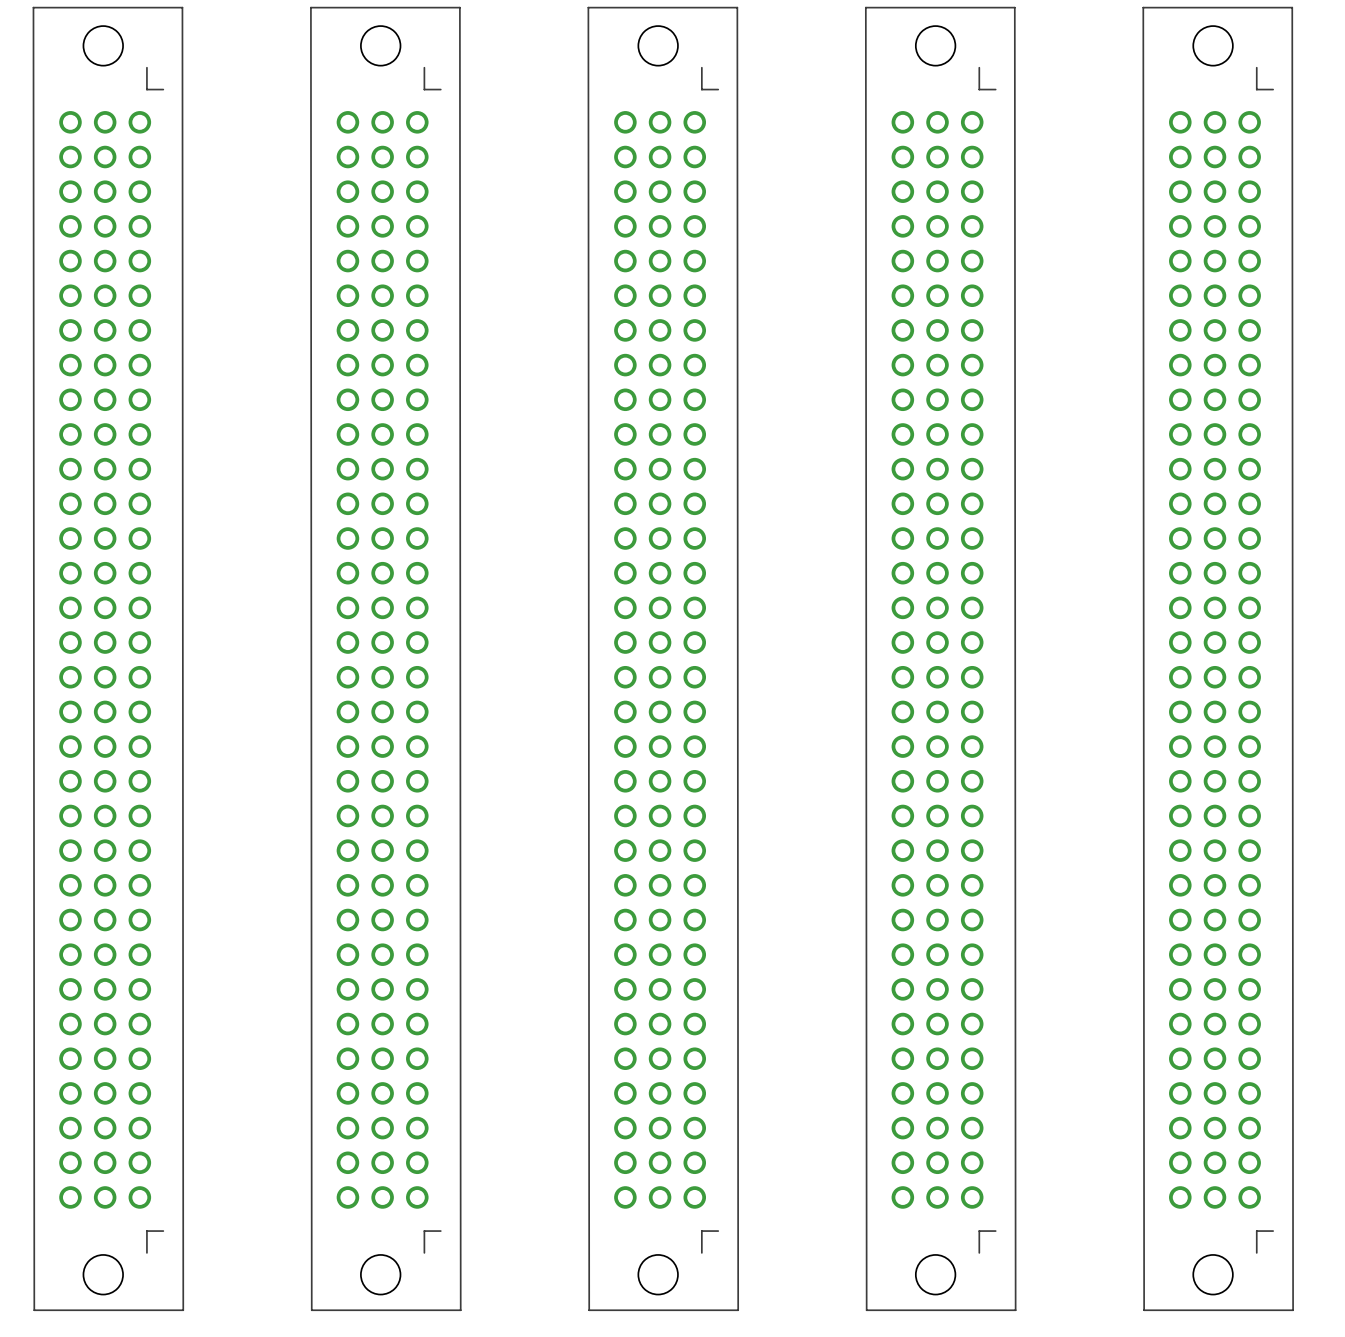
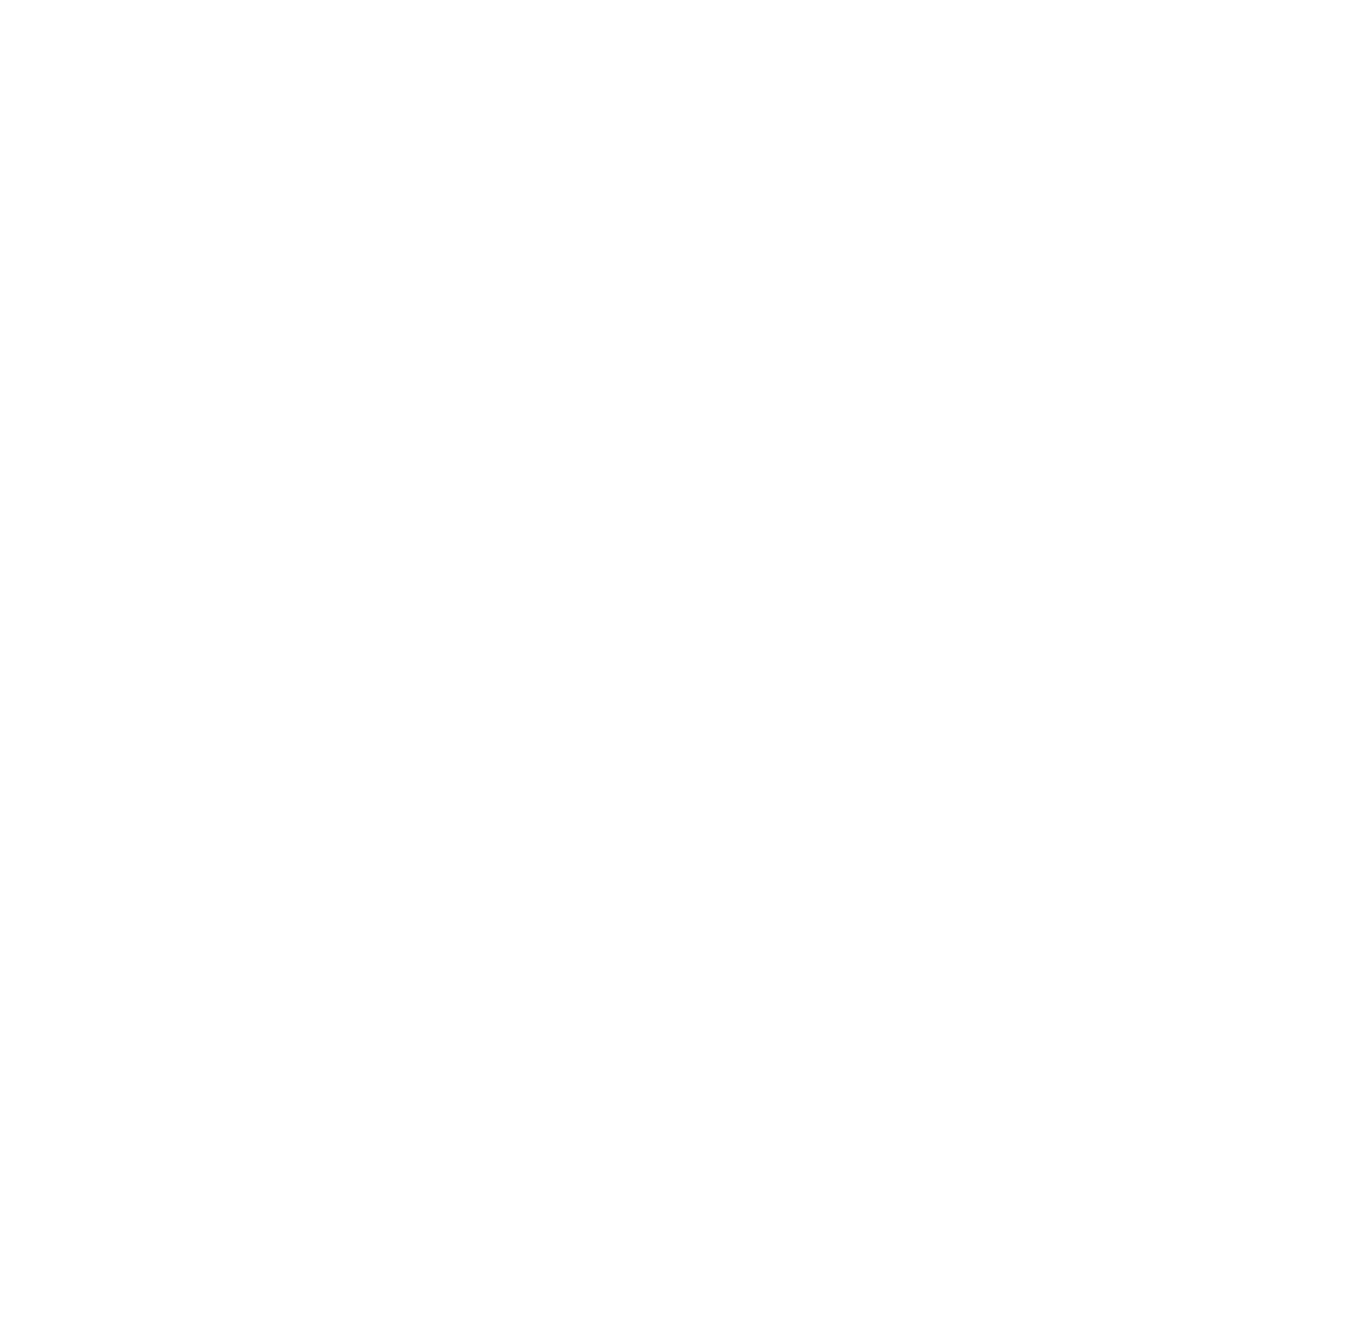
part: (108, 658) -> none
part: (385, 658) -> none
part: (663, 658) -> none
part: (940, 658) -> none
part: (1218, 658) -> none

